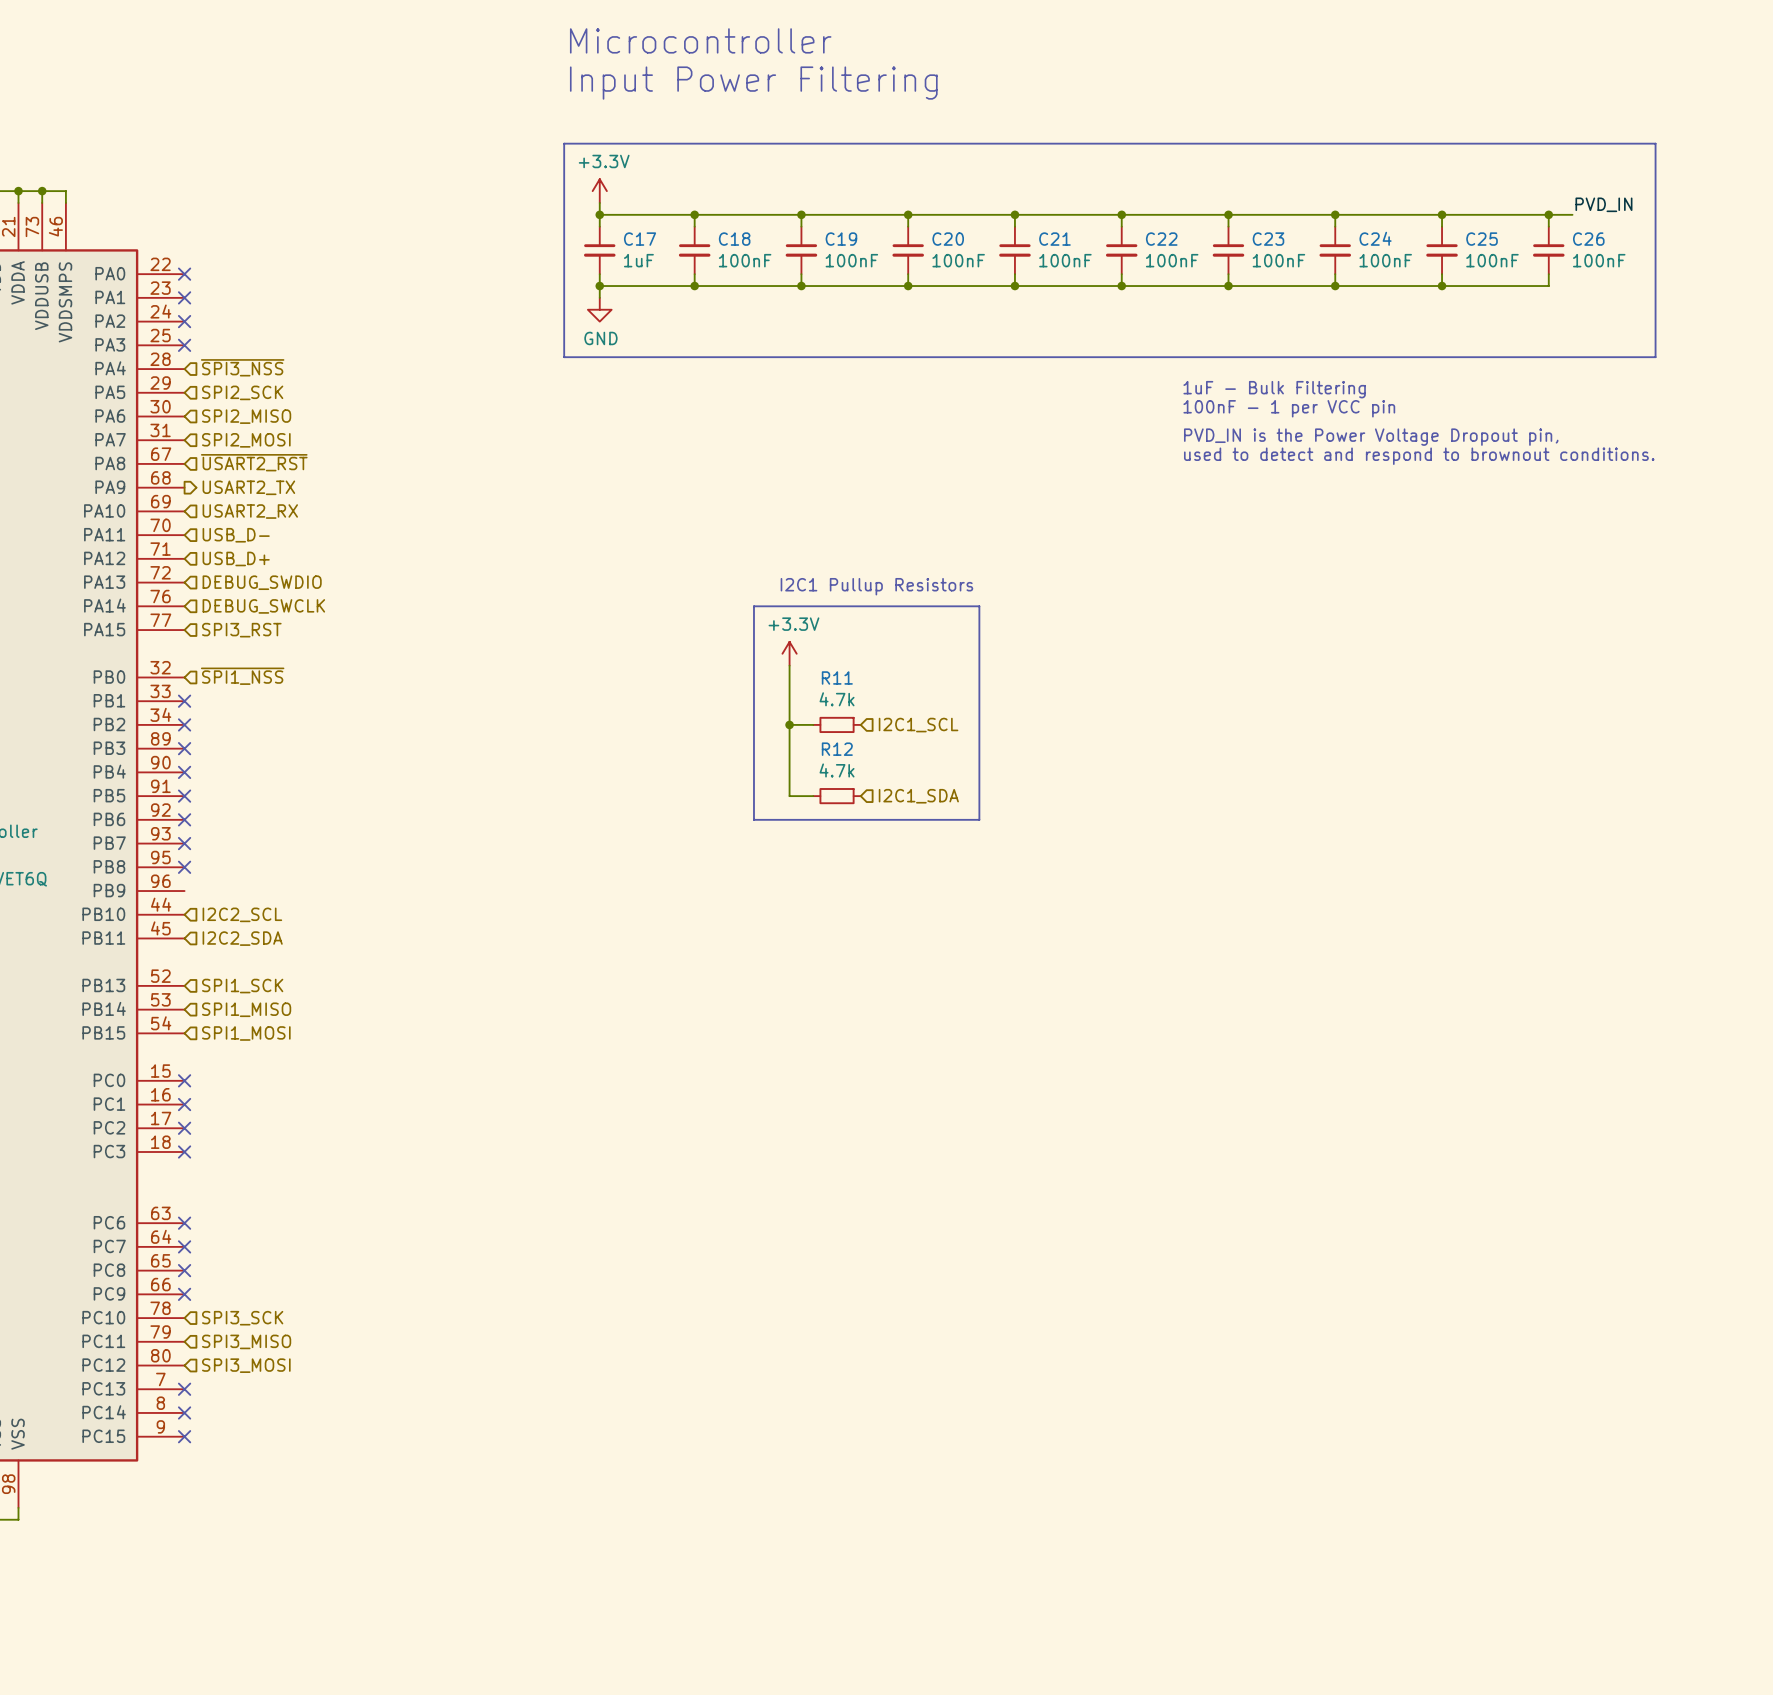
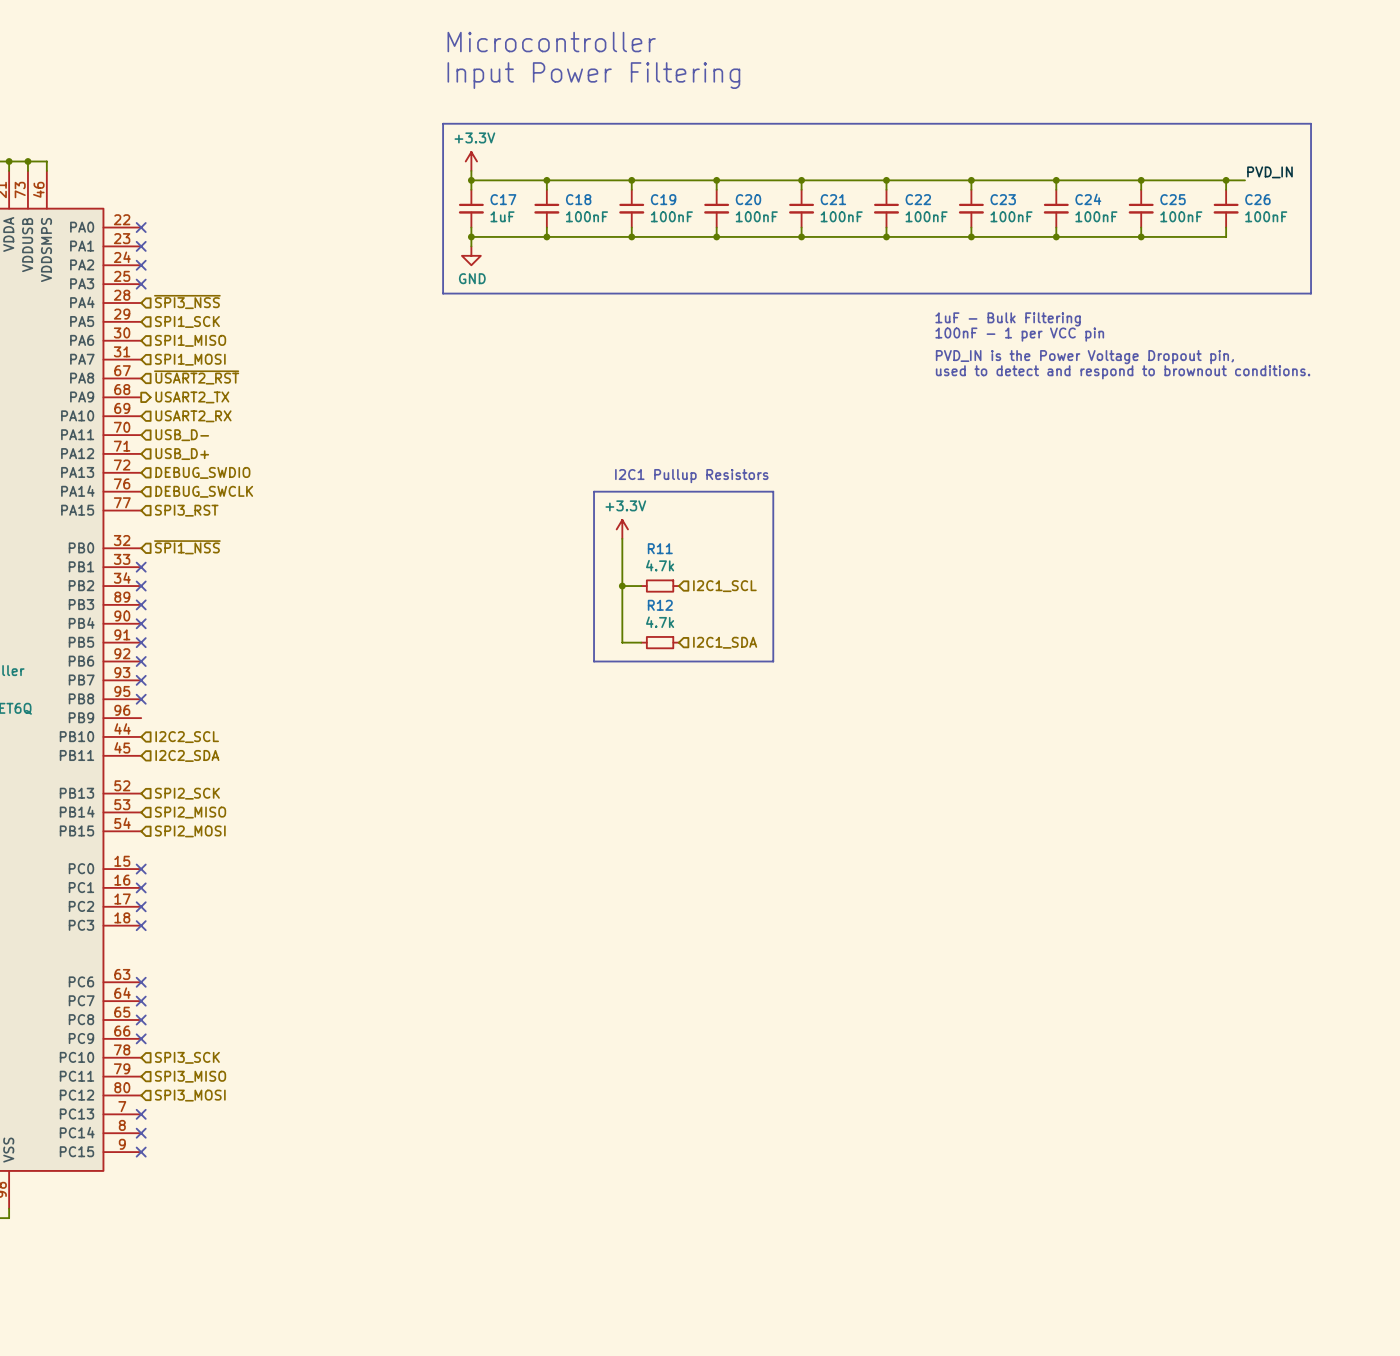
hierarchical label: SPI2_SCK (242, 392) -> SPI1_SCK (187, 321)
hierarchical label: SPI2_MISO (246, 416) -> SPI1_MISO (190, 340)
hierarchical label: SPI2_MOSI (246, 440) -> SPI1_MOSI (190, 359)
hierarchical label: SPI1_SCK (242, 986) -> SPI2_SCK (187, 793)
hierarchical label: SPI1_MISO (246, 1009) -> SPI2_MISO (190, 812)
hierarchical label: SPI1_MOSI (246, 1033) -> SPI2_MOSI (190, 831)

